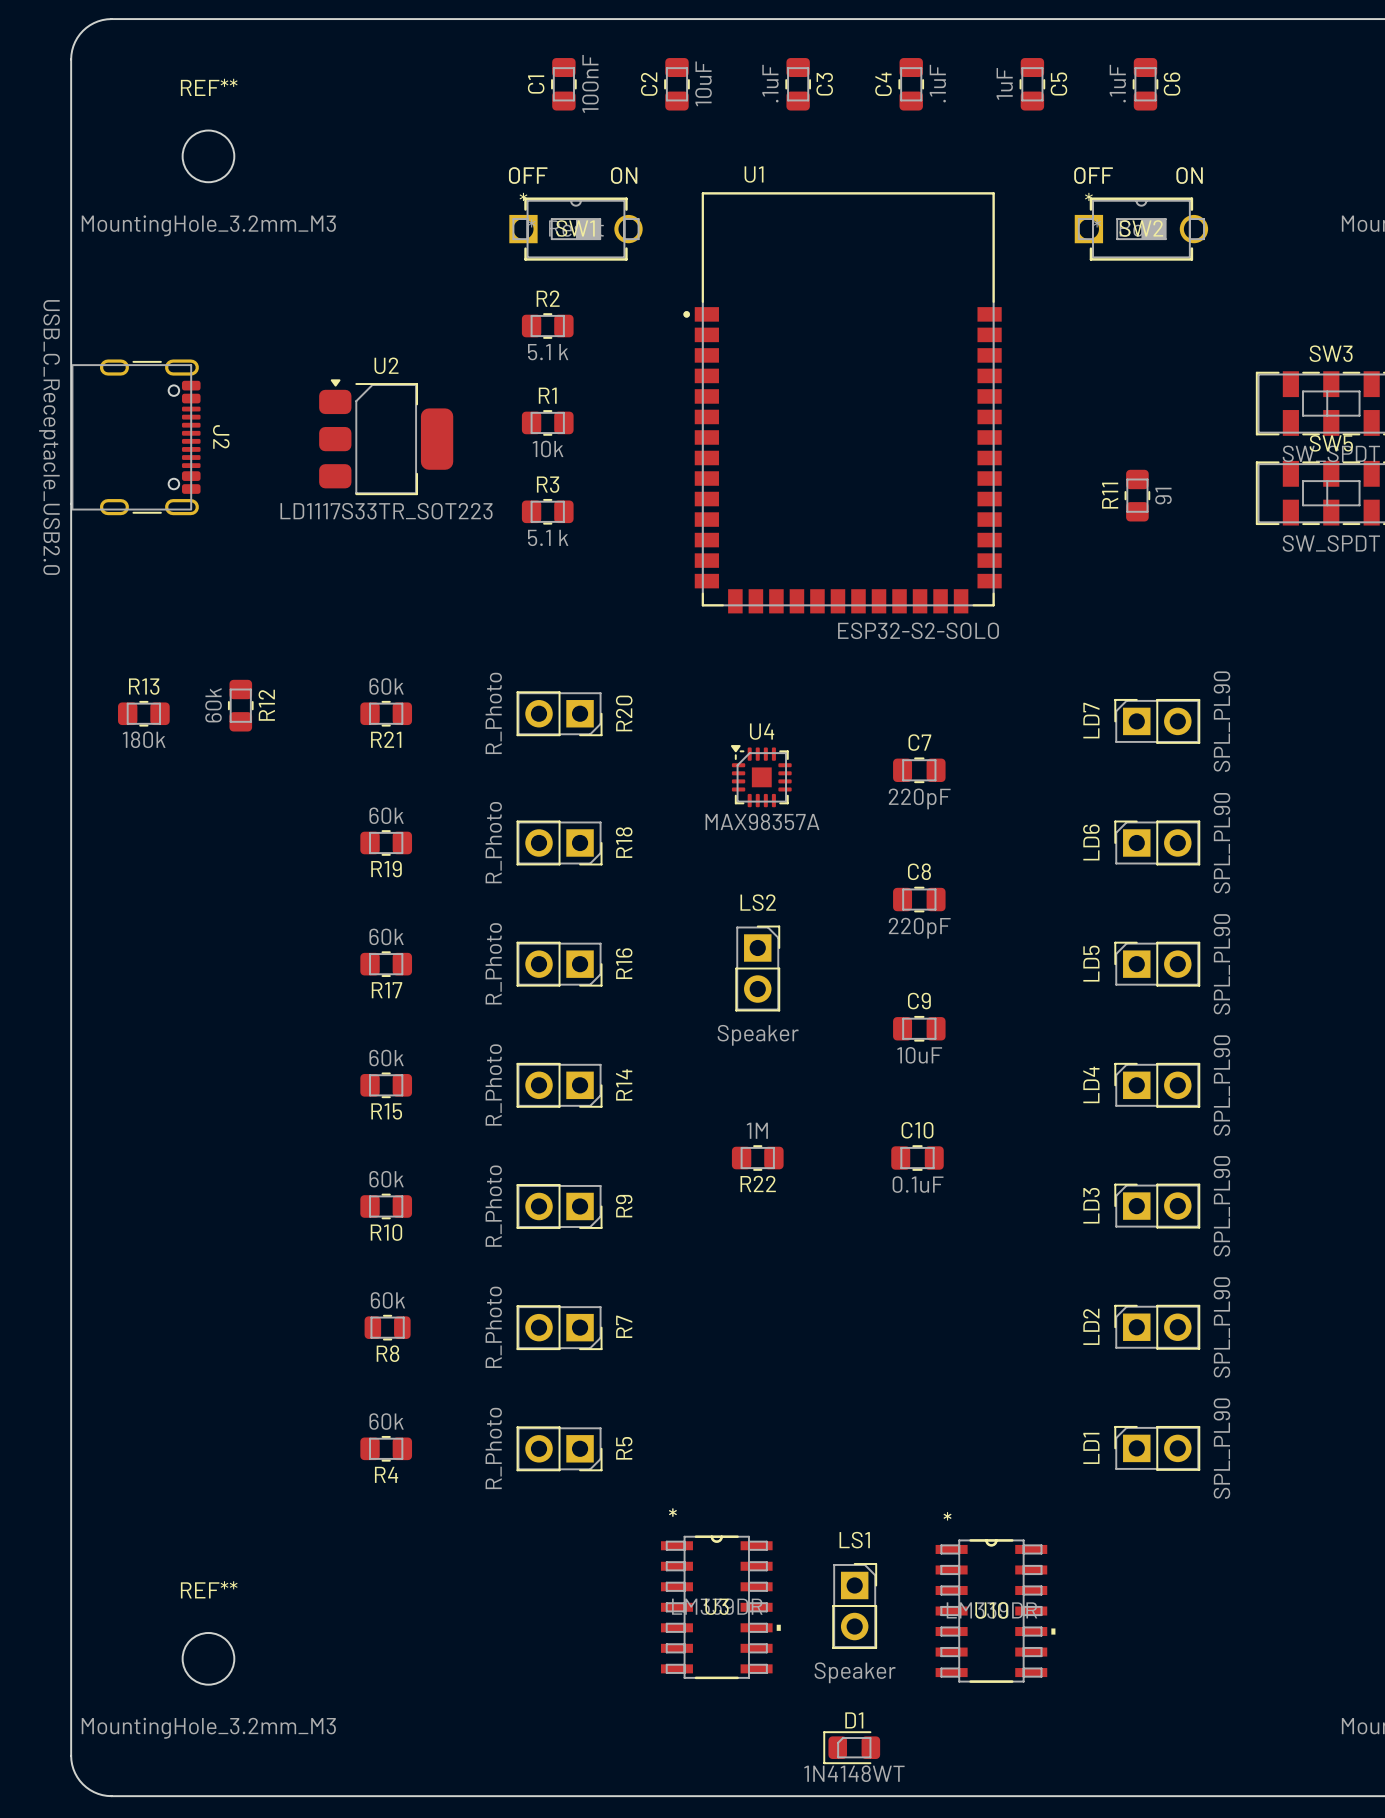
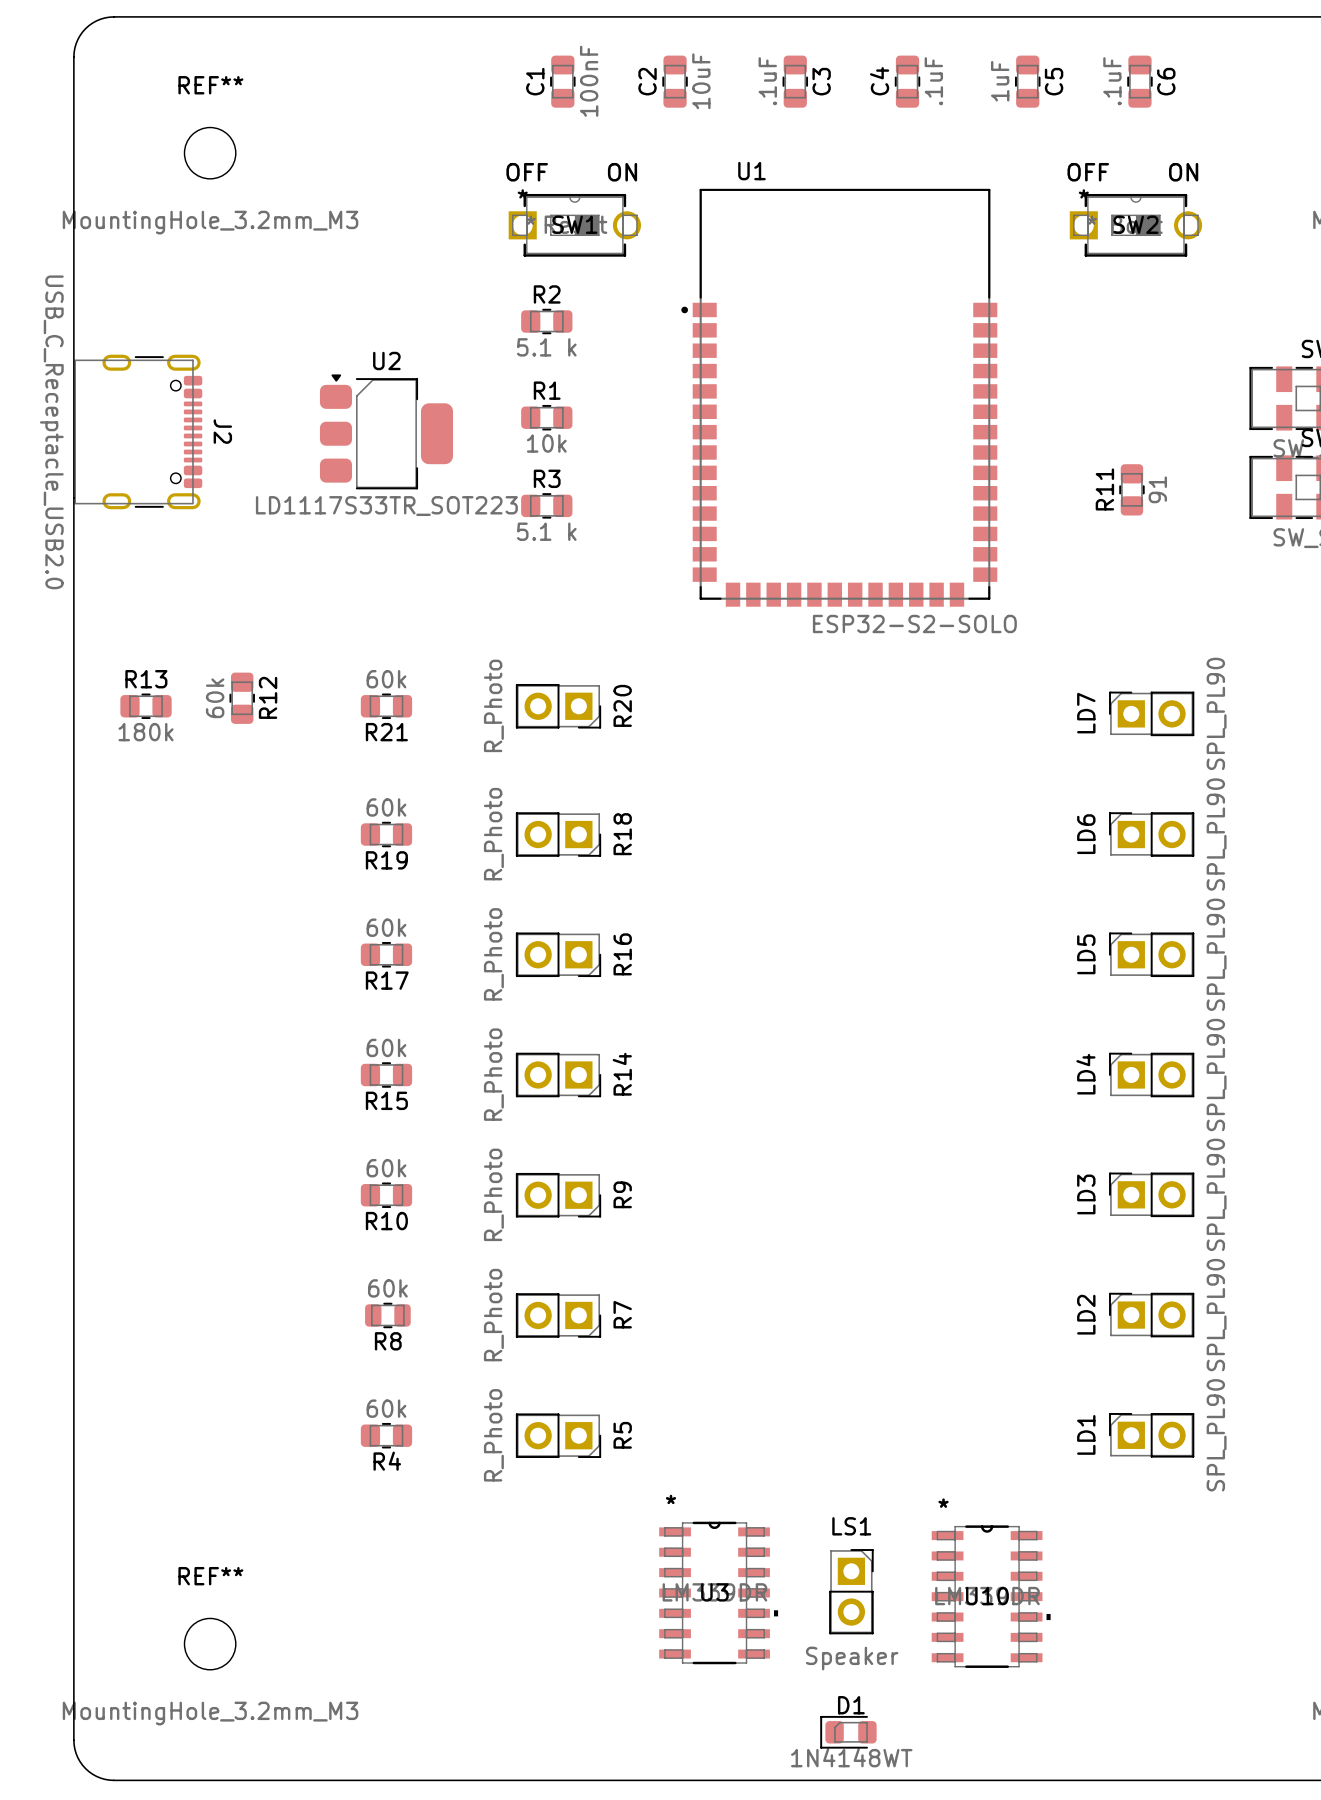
C7: 220pF (919, 770) -> none
U4: MAX98357A (761, 776) -> none
C8: 220pF (919, 899) -> none
LS2: Speaker (757, 968) -> none
C9: 10uF (919, 1028) -> none
R22: 1M (757, 1158) -> none
C10: 0.1uF (917, 1158) -> none

